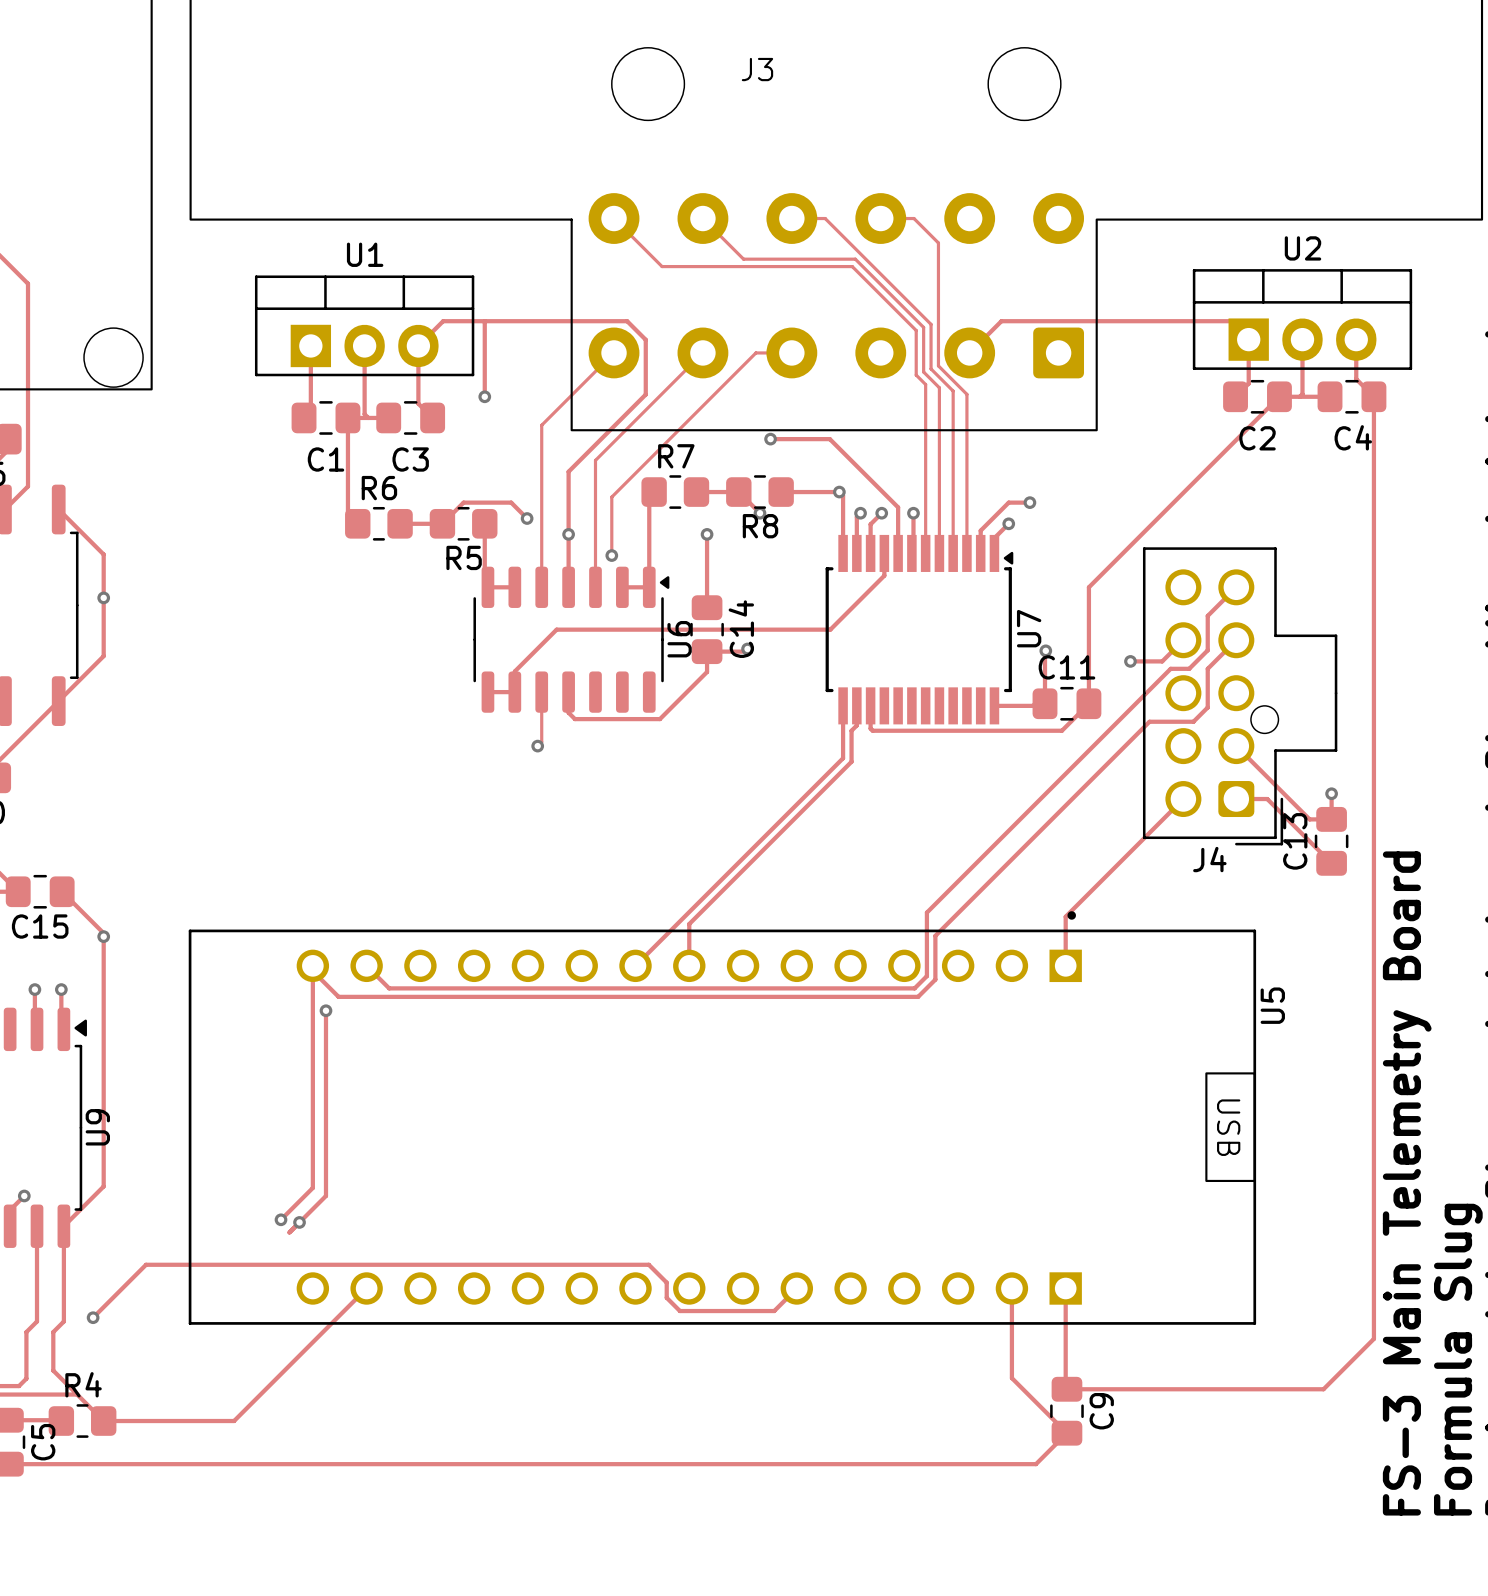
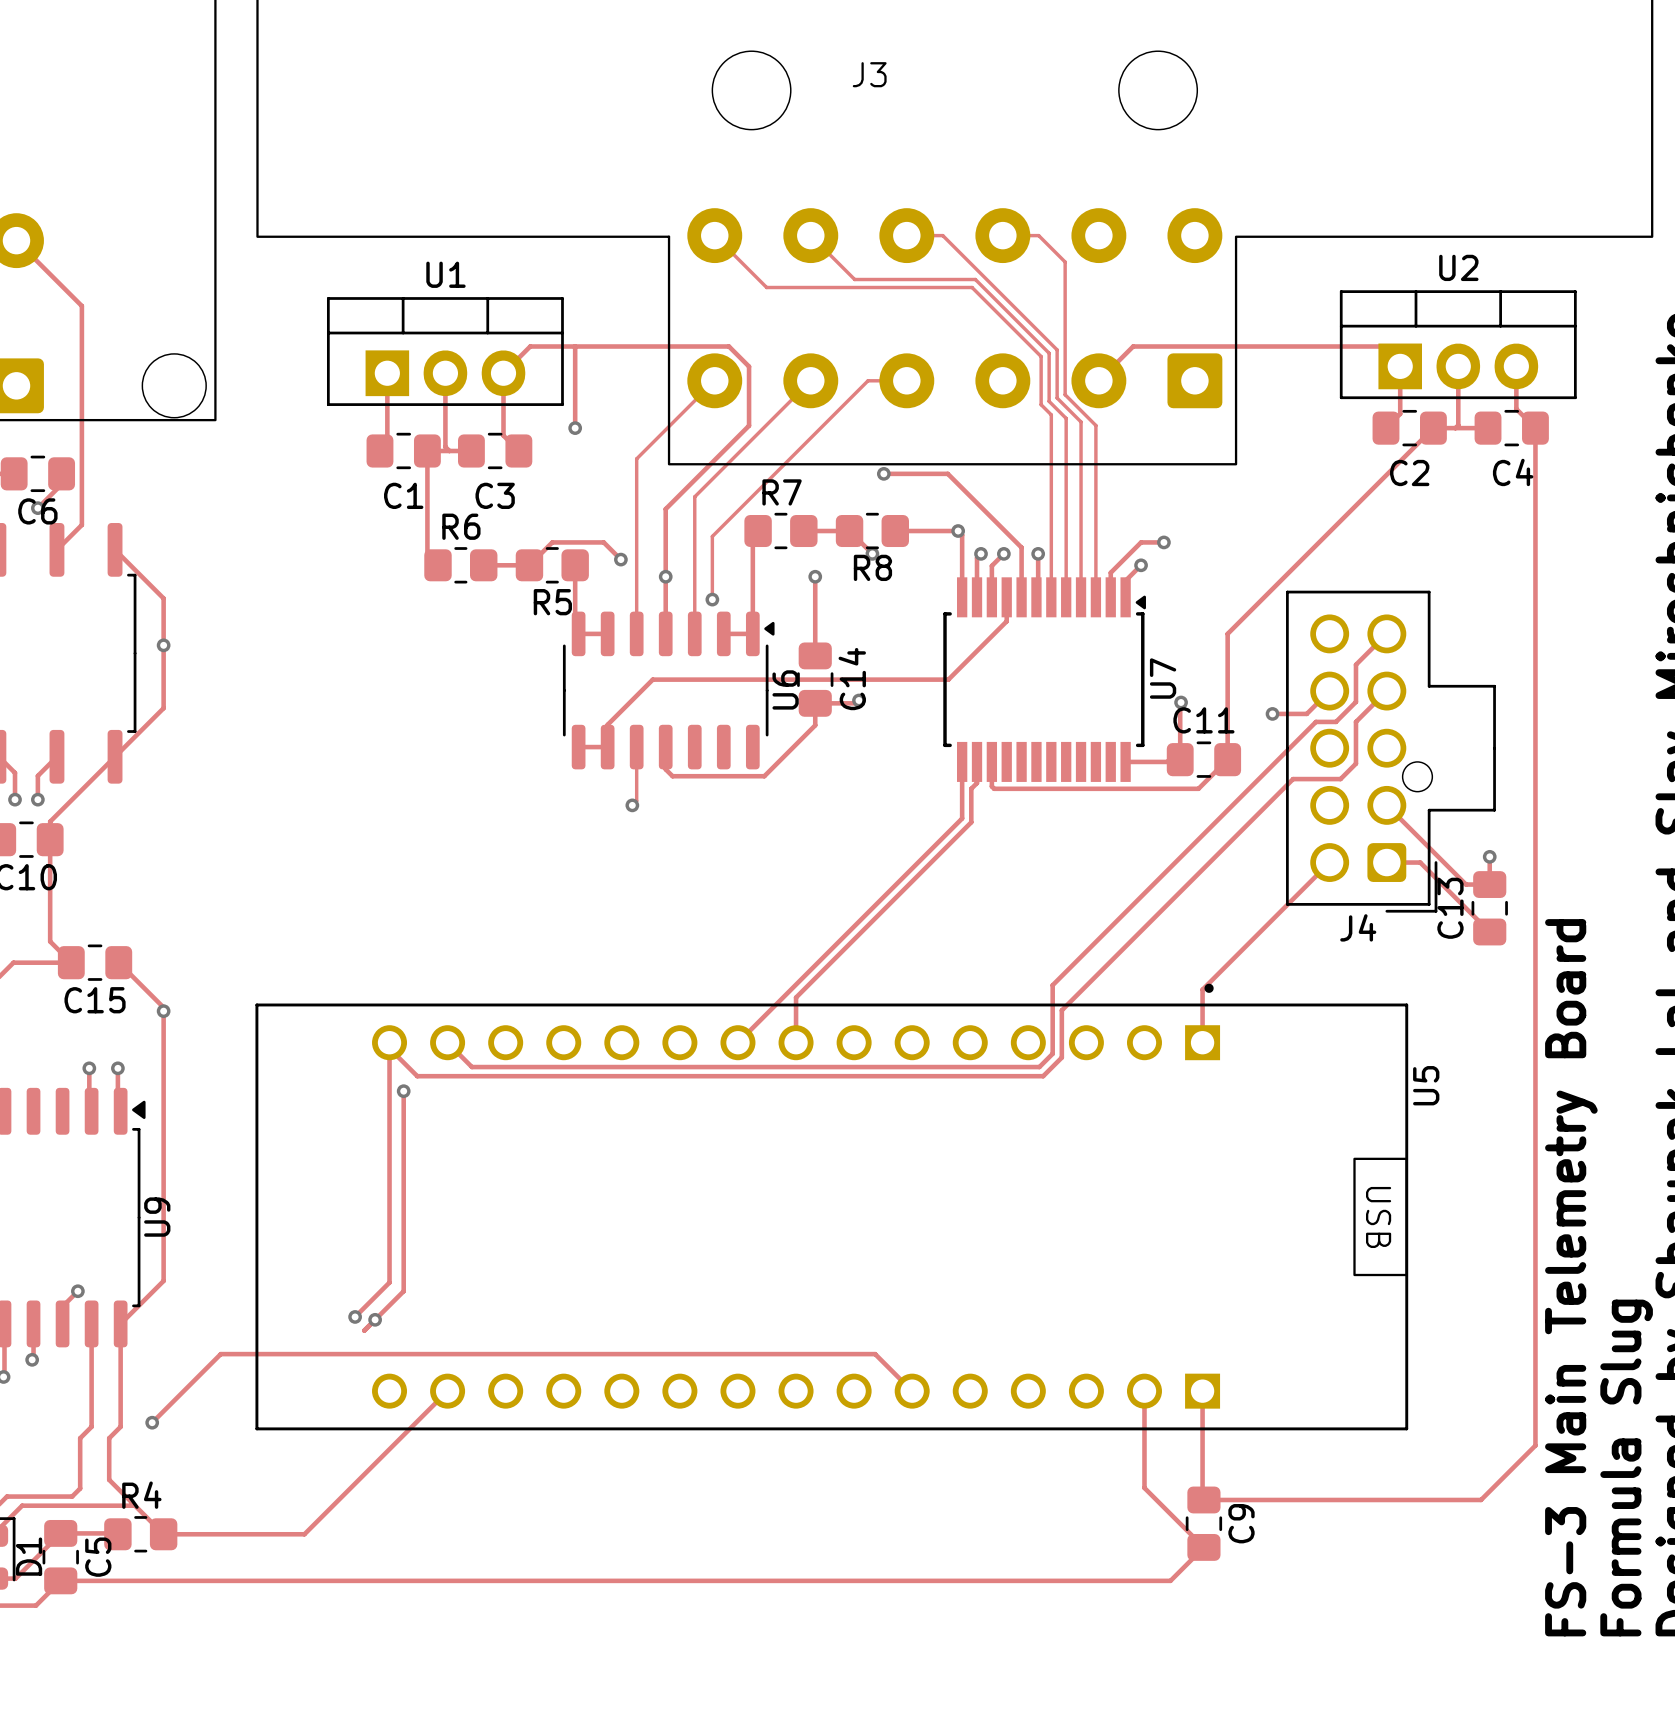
track: (146, 1264) (648, 1264) (666, 1282) (666, 1297) (679, 1311) (774, 1311) (796, 1288) -> (209, 1365) (220, 1354) (875, 1354) (912, 1391)

